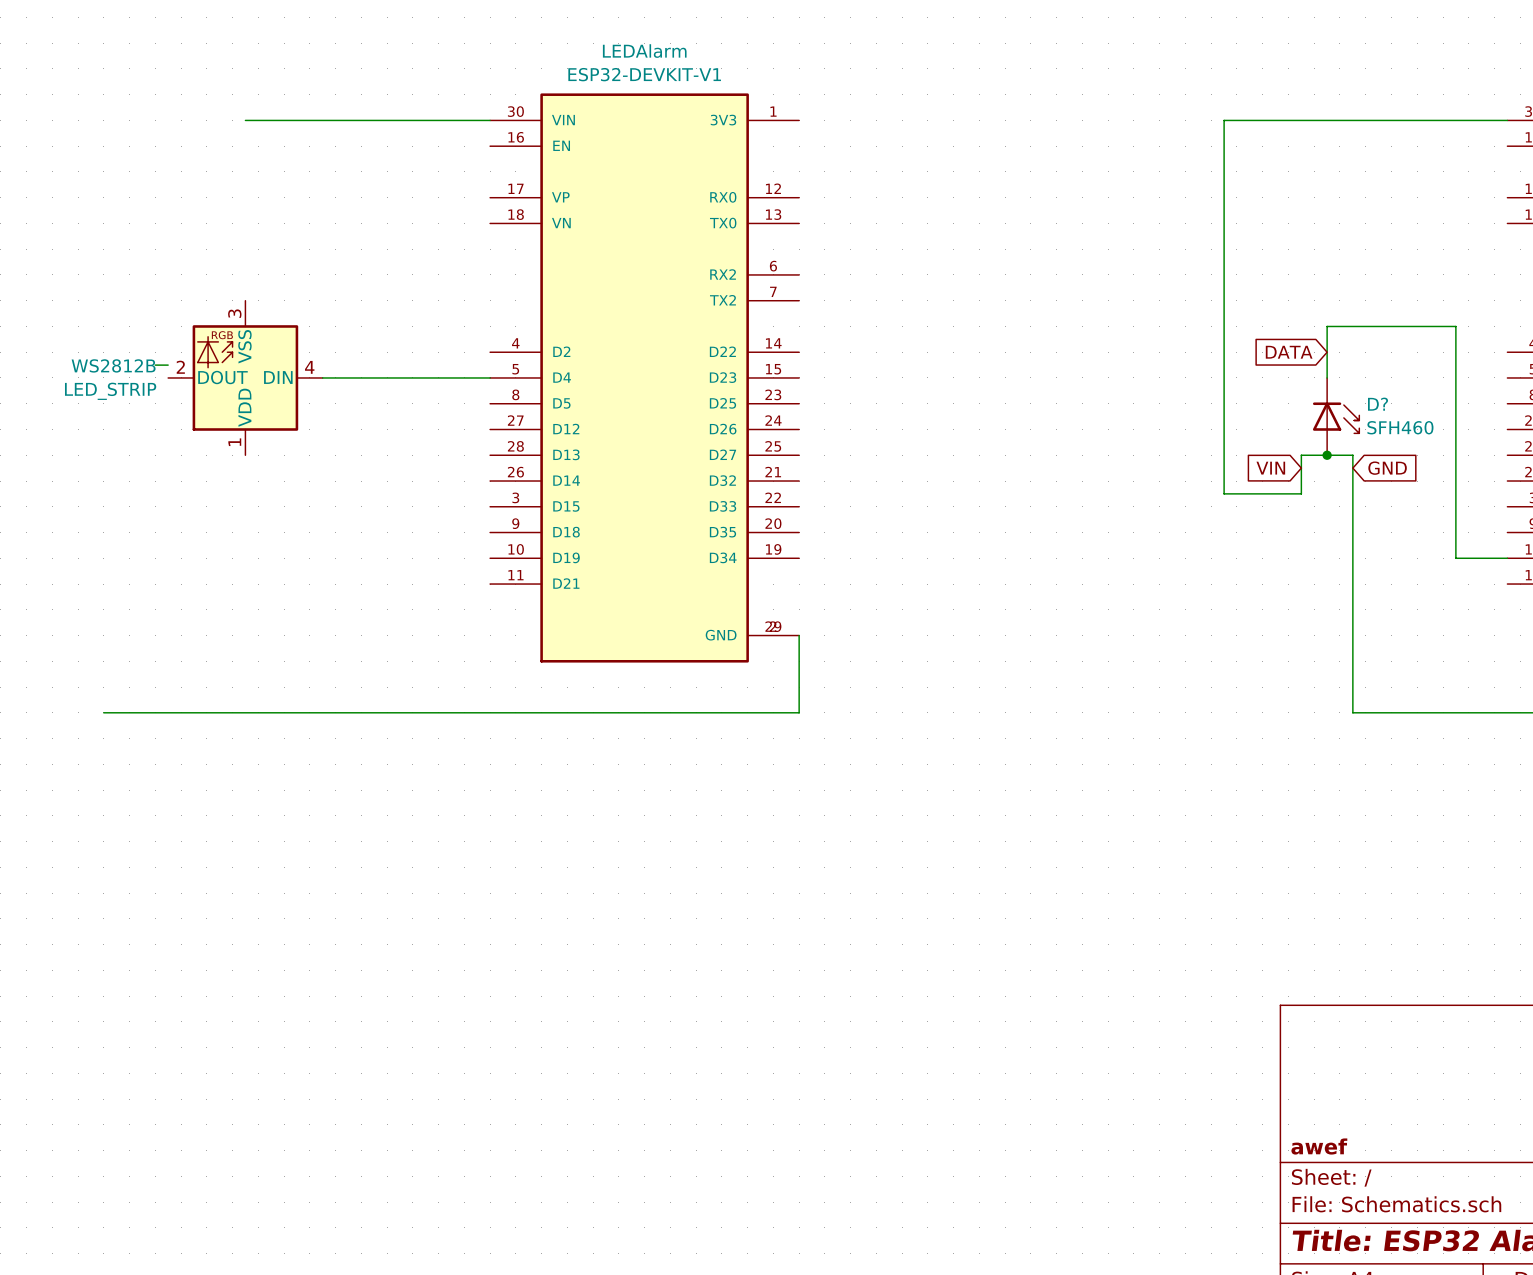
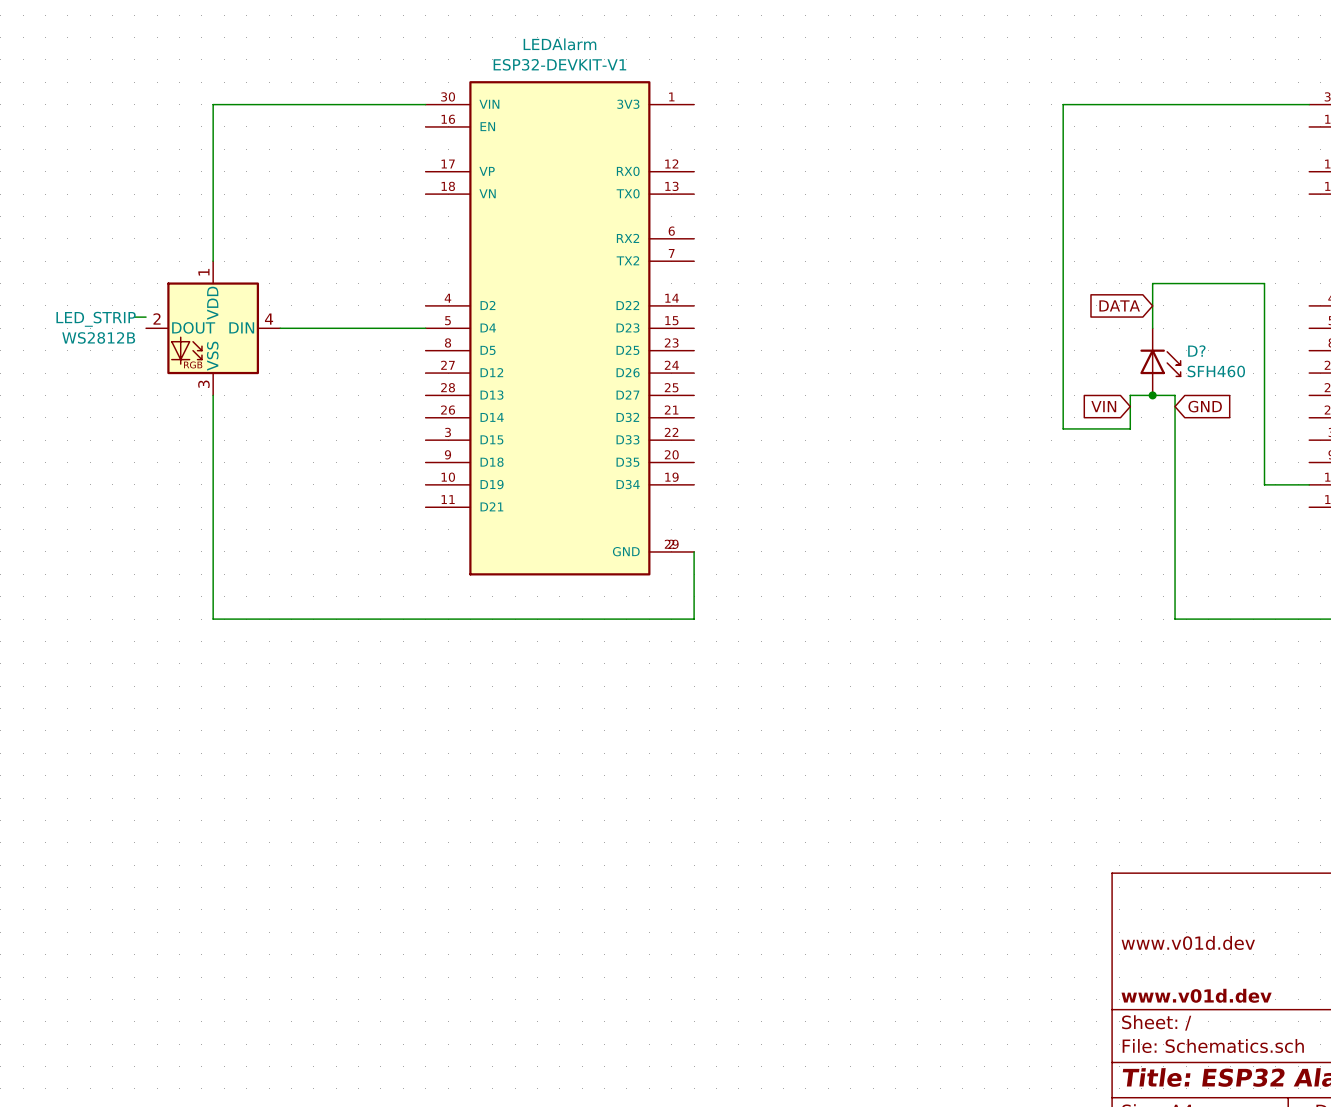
wire: none -> (213, 104) (213, 261)
LED_STRIP flip: as is (245, 377) -> up-down (213, 328)
wire: (103, 712) (245, 712) -> (213, 395) (213, 619)
title block: none -> www.v01d.dev (1188, 942)
title block: awef (1319, 1146) -> www.v01d.dev (1196, 995)

